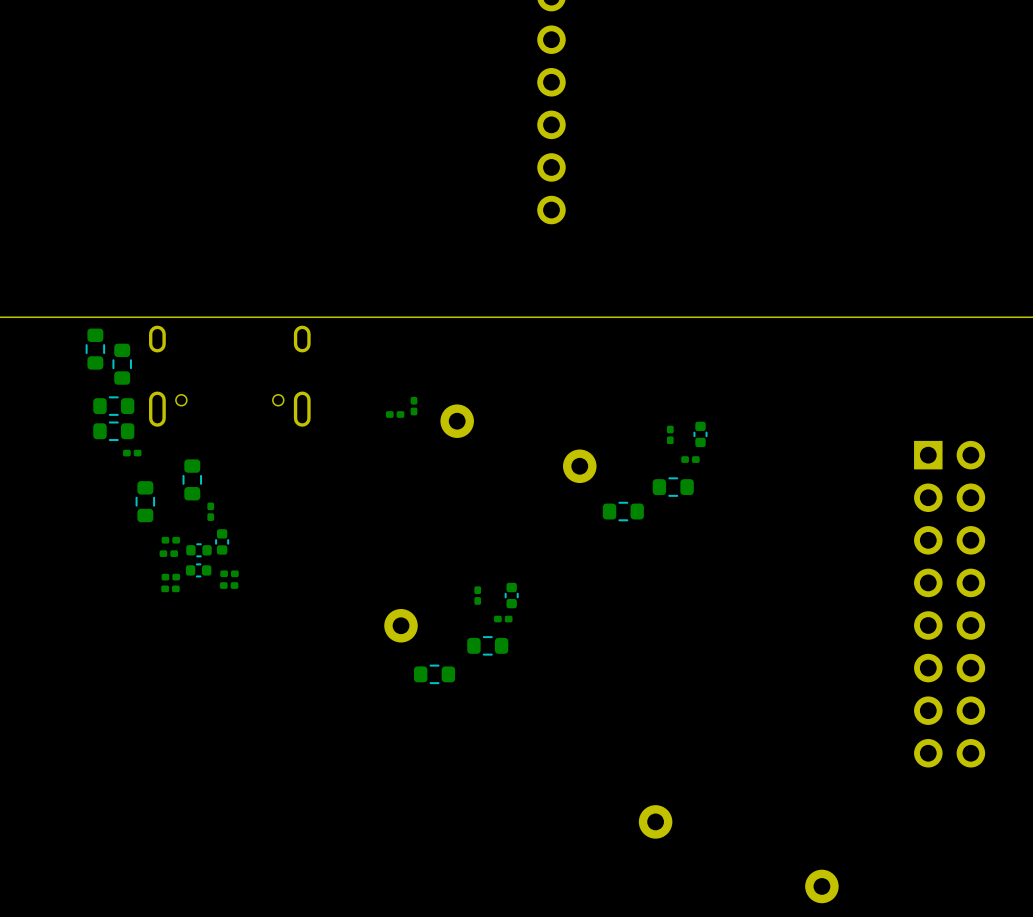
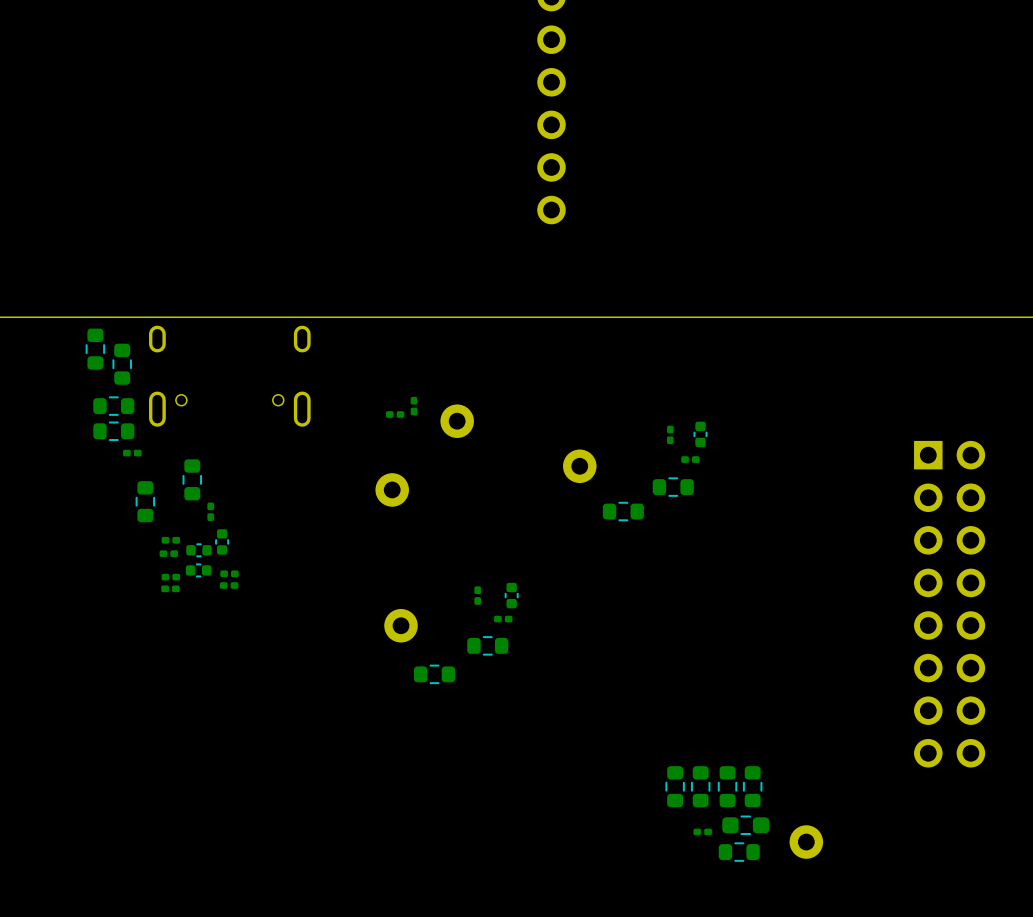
part: none -> (392, 489)
part: none -> (675, 786)
part: none -> (700, 786)
part: none -> (727, 786)
part: none -> (752, 786)
part: (655, 821) -> none
part: none -> (745, 825)
part: none -> (702, 831)
part: none -> (739, 852)
part position: (821, 886) -> (806, 842)

